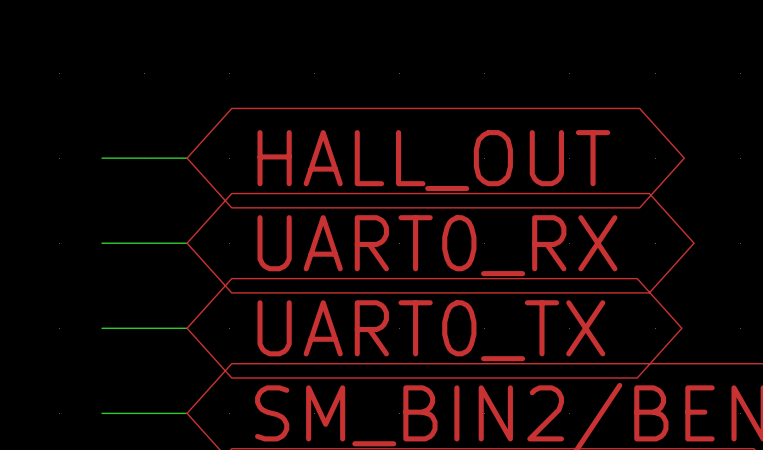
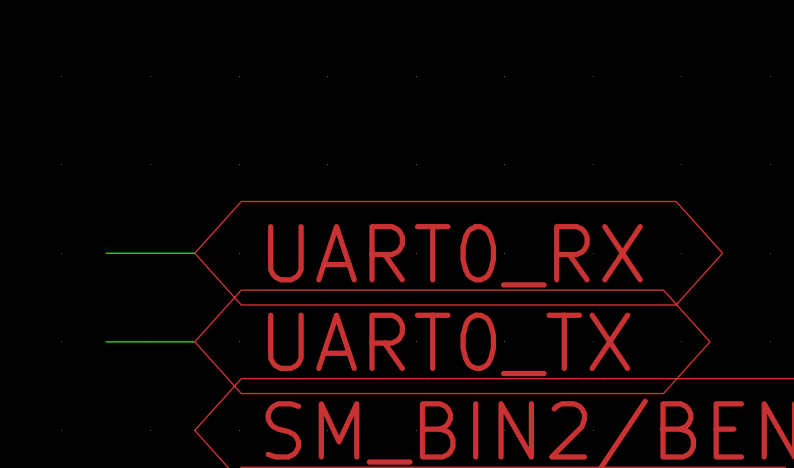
wire: (102, 158) (187, 158) -> none
global label: HALL_OUT (433, 160) -> none
wire: (102, 413) (187, 413) -> none

